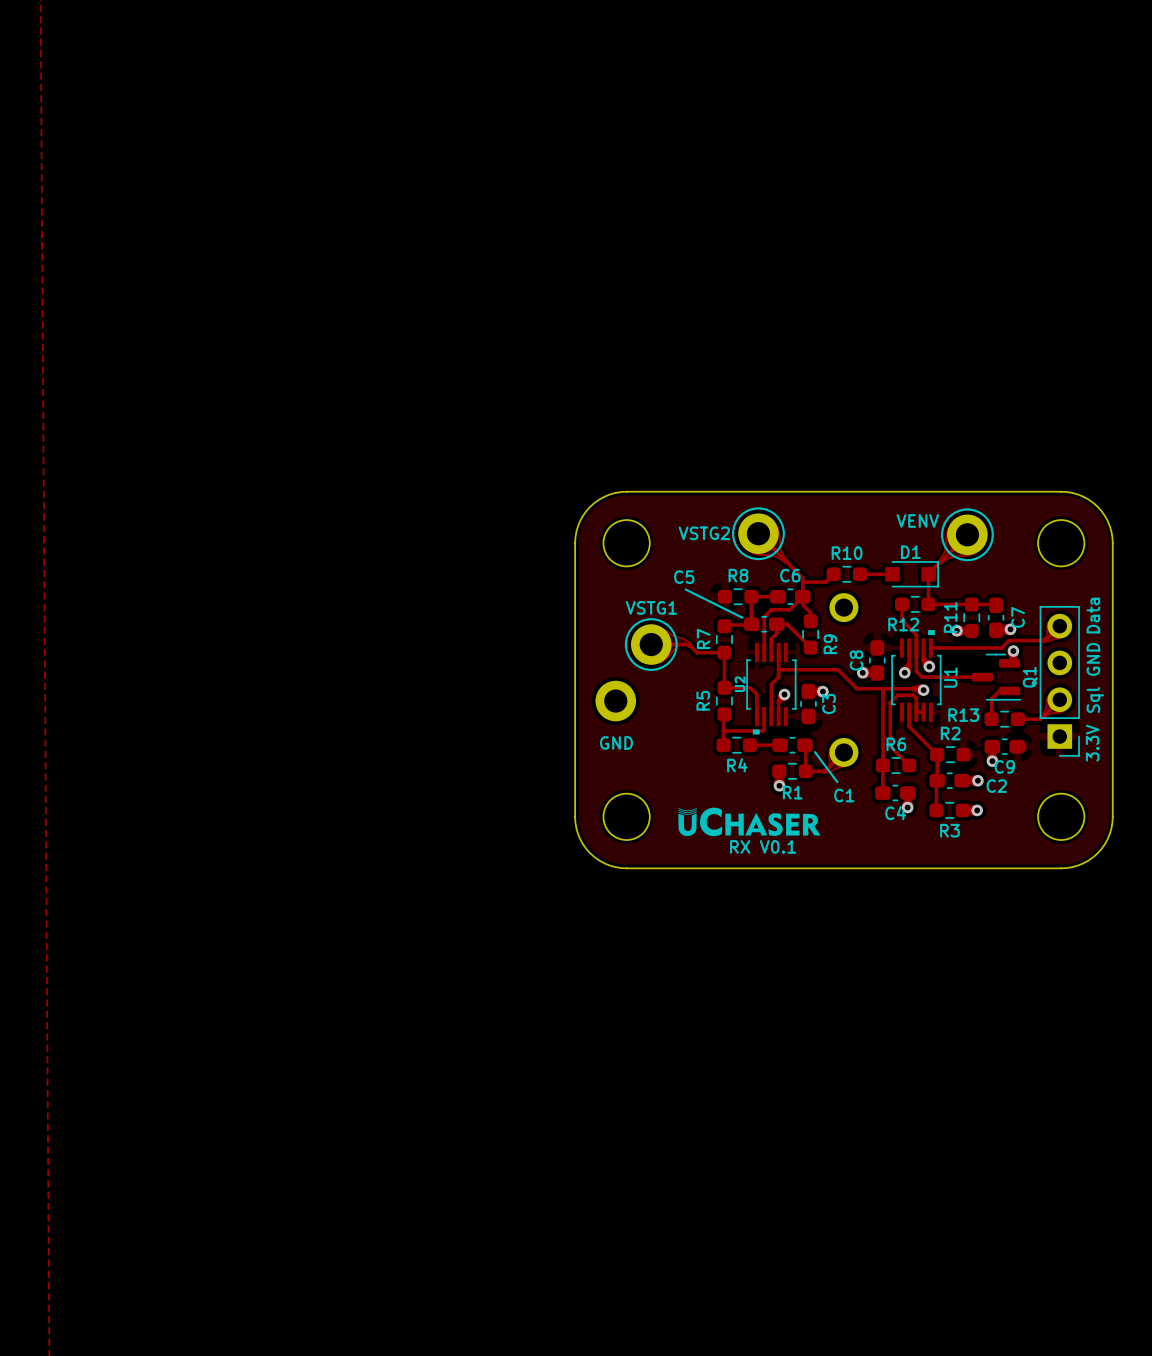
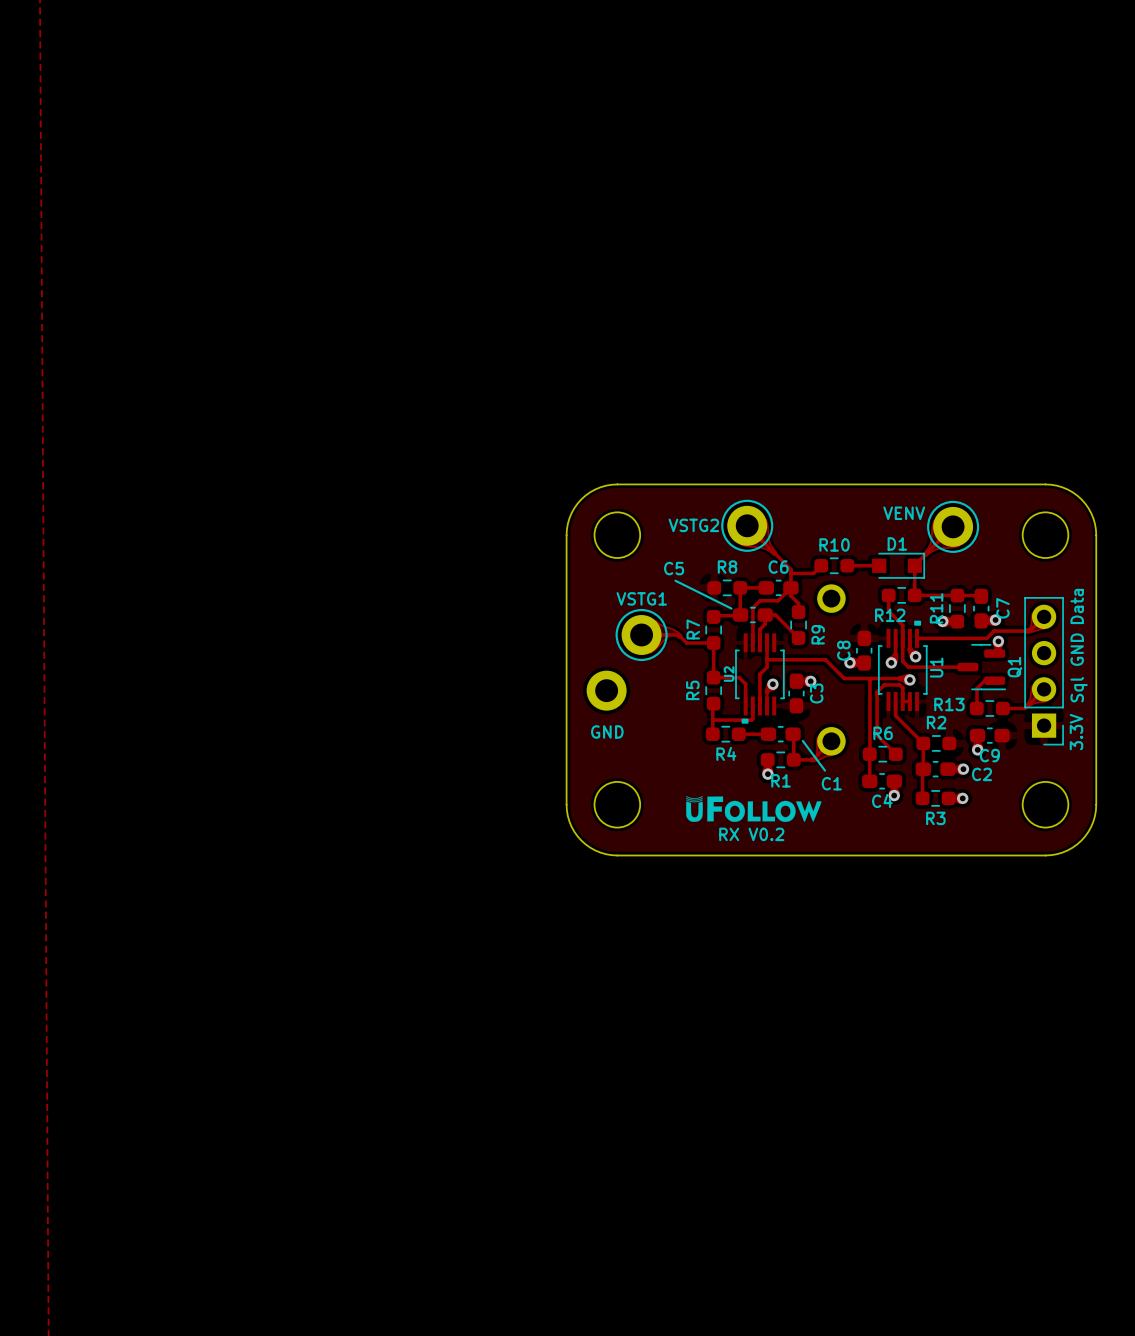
drawing: [678, 807, 821, 837] -> none
drawing: none -> [686, 795, 822, 822]
text: RX V0.1 (763, 846) -> RX V0.2 (751, 834)

